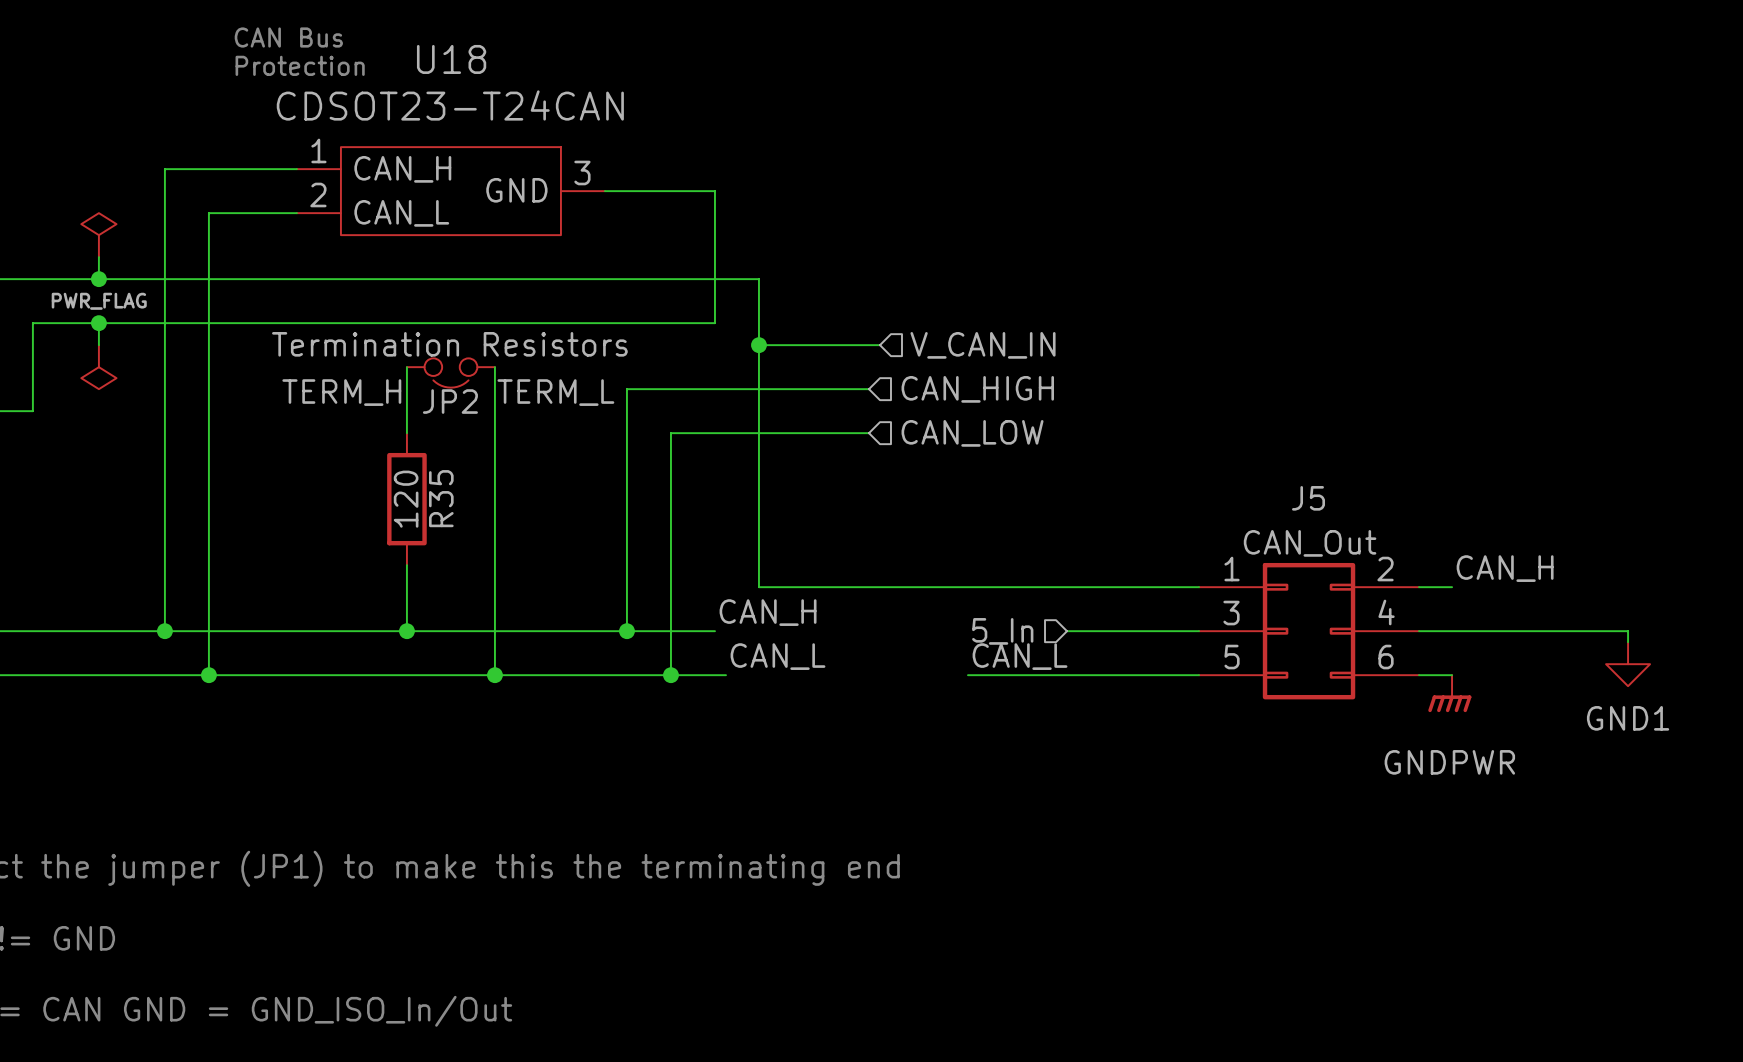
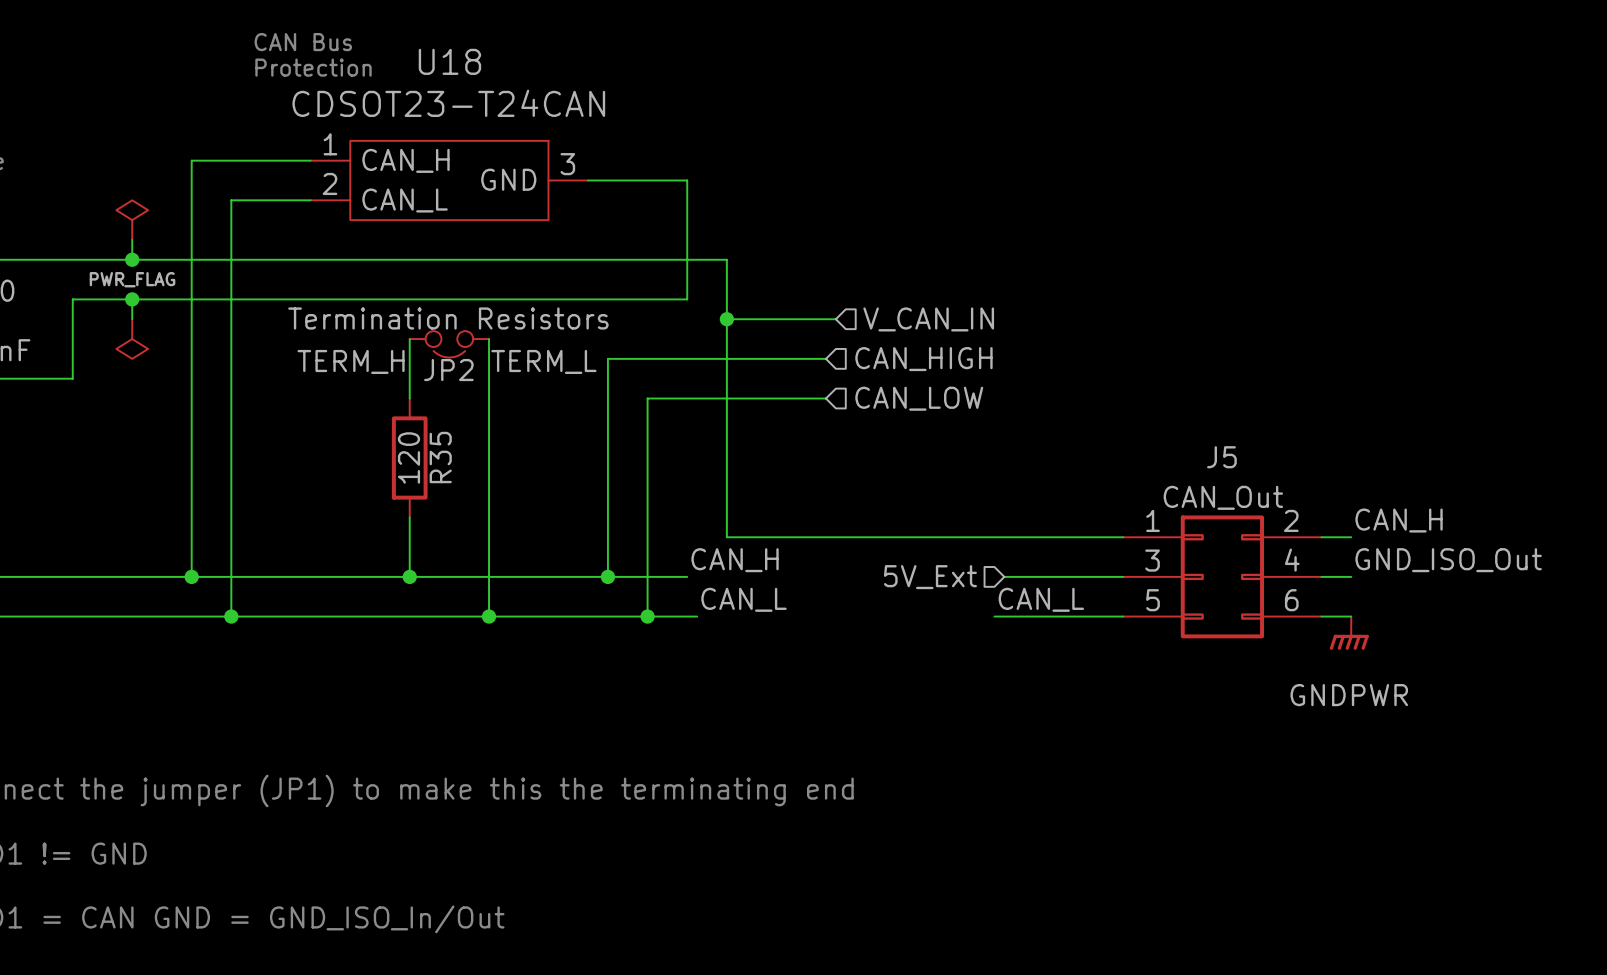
label: none -> GND_ISO_Out (1448, 560)
hierarchical label: 5_In (1002, 631) -> 5V_Ext (930, 577)
wire: (1452, 631) (1628, 631) (1628, 642) -> none
label position: CAN_L (1020, 656) -> CAN_L (1041, 599)
power symbol: GND1 (1628, 664) -> none
wire: (968, 675) (1056, 675) -> none

